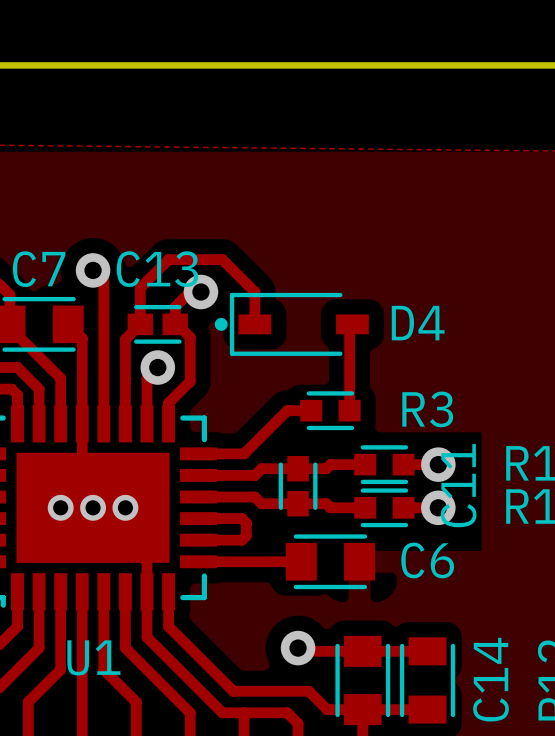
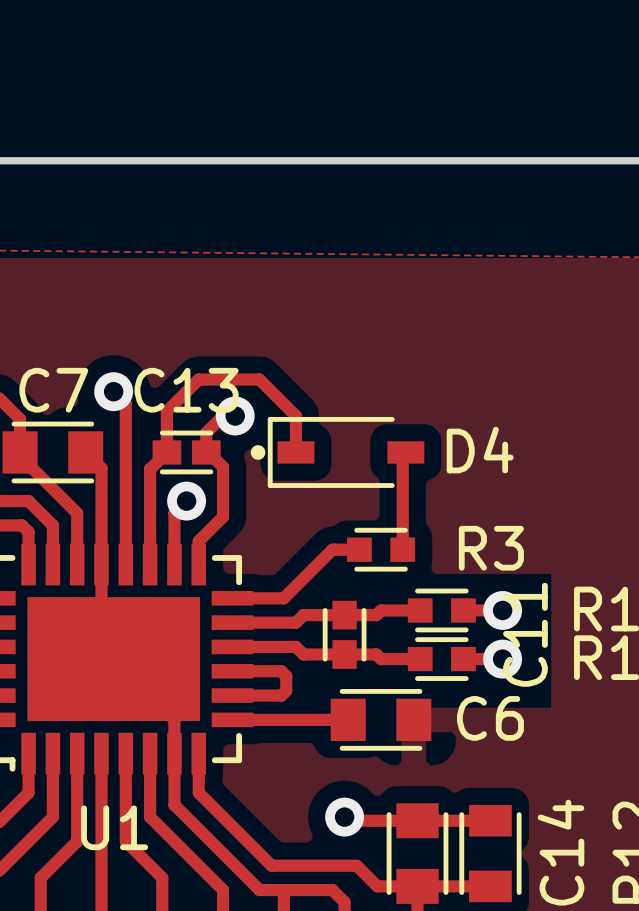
via: (60, 507) -> none
via: (93, 507) -> none
via: (125, 507) -> none

